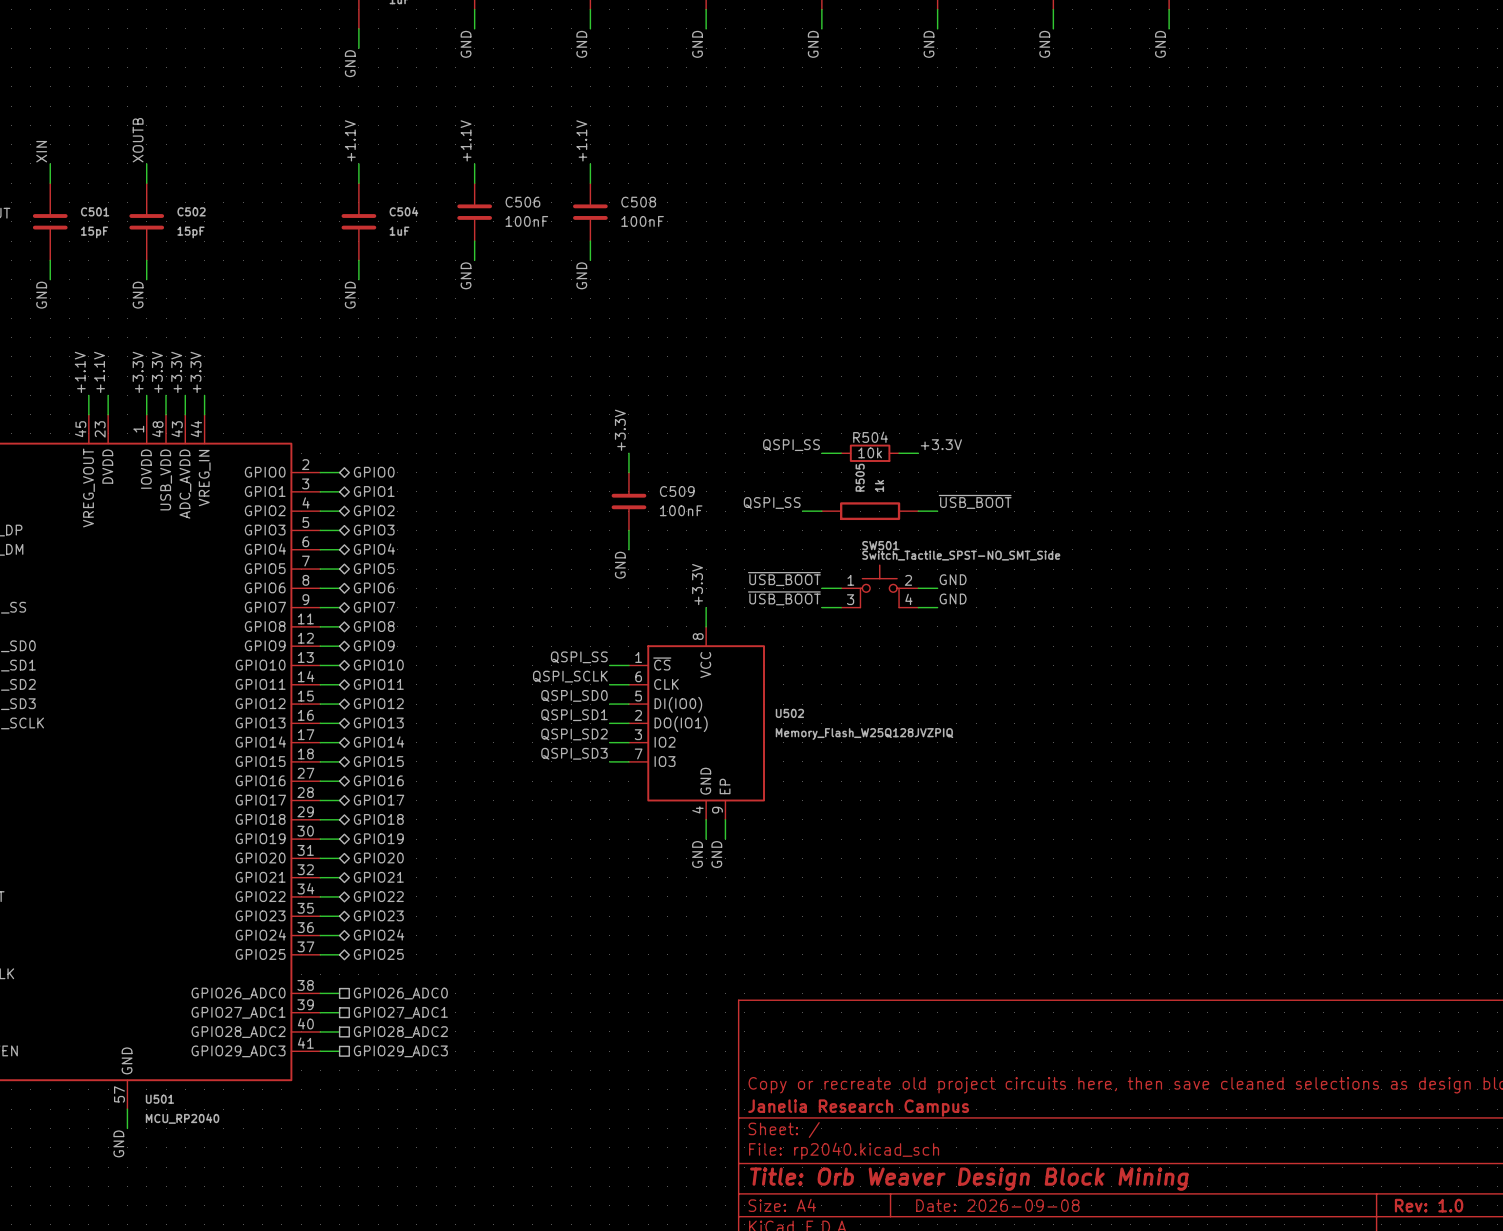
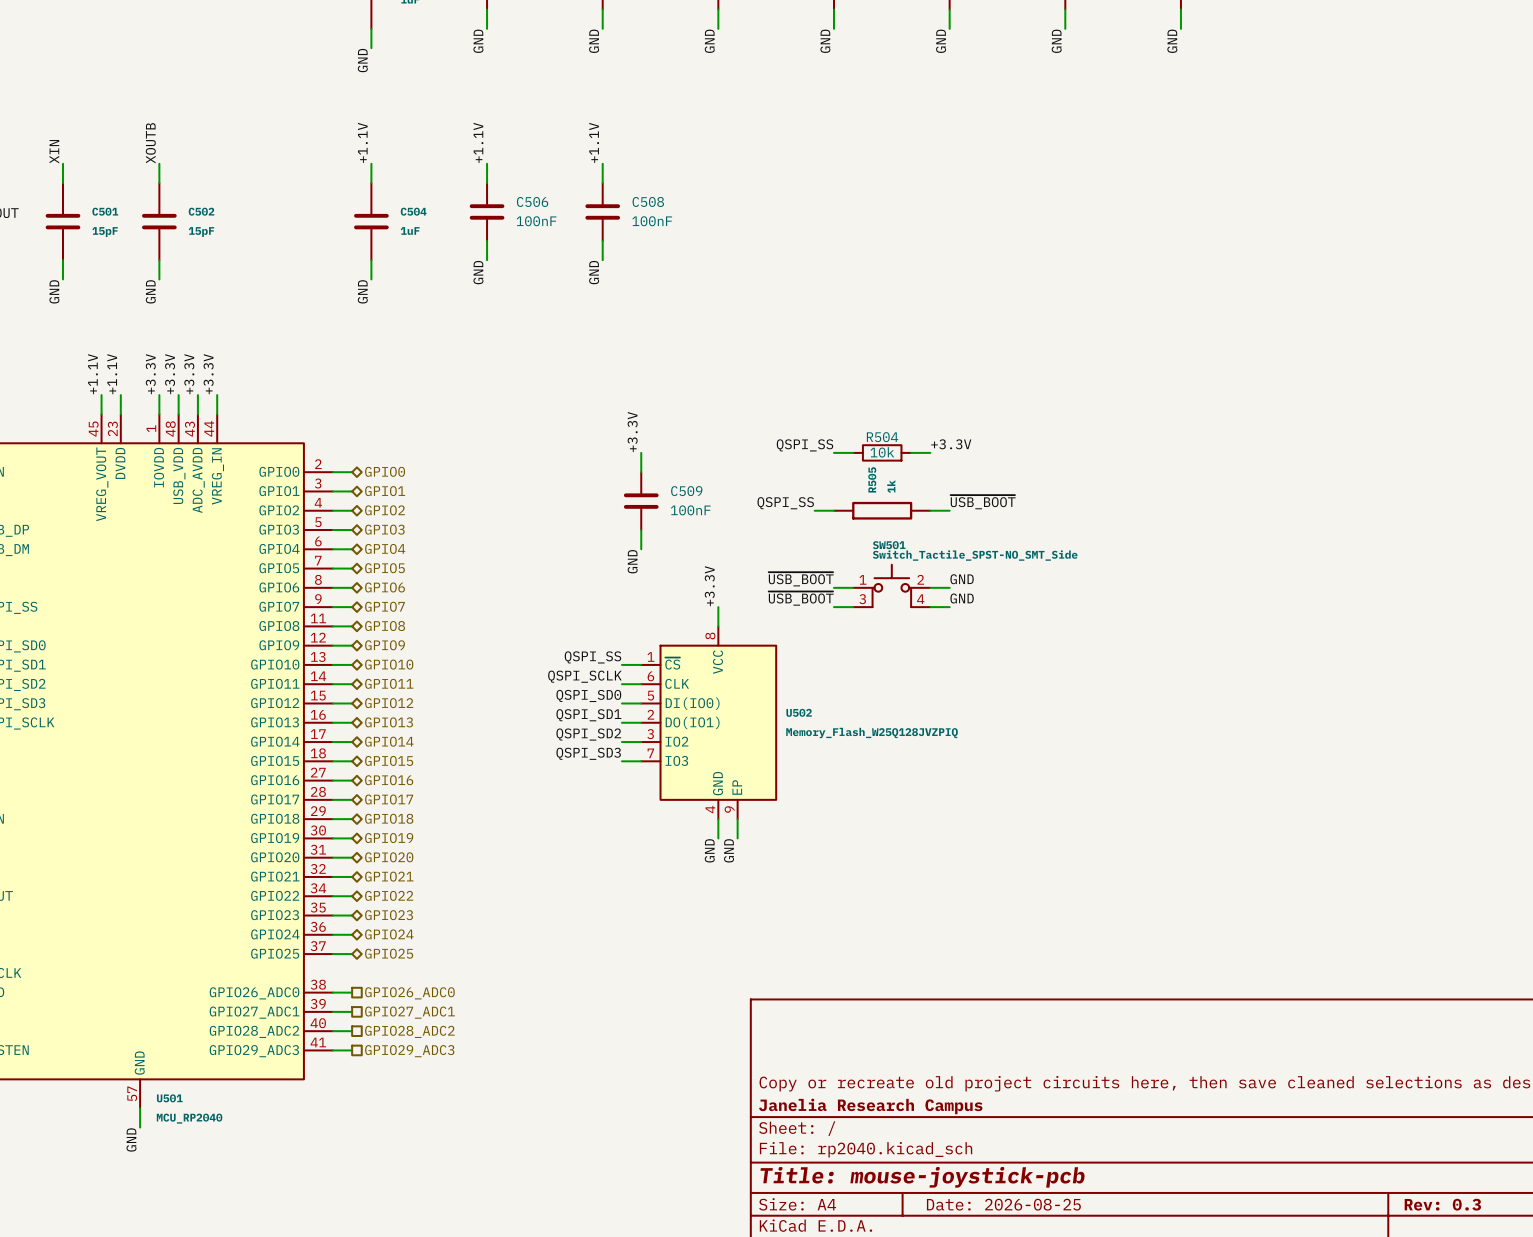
title block: Title: Orb Weaver Design Block Mining (969, 1179) -> Title: mouse-joystick-pcb (922, 1177)
title block: Date: 2026-09-08 (997, 1205) -> Date: 2026-08-25 (1003, 1204)
title block: Rev: 1.0 (1429, 1205) -> Rev: 0.3 (1442, 1204)

